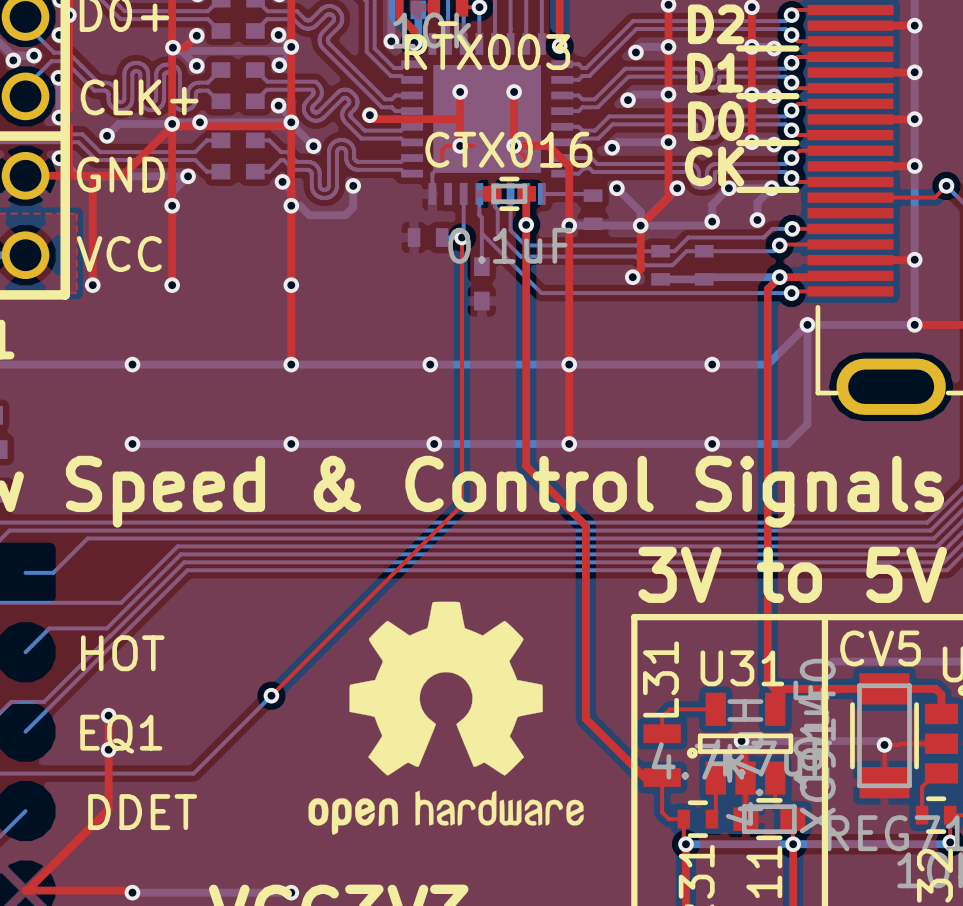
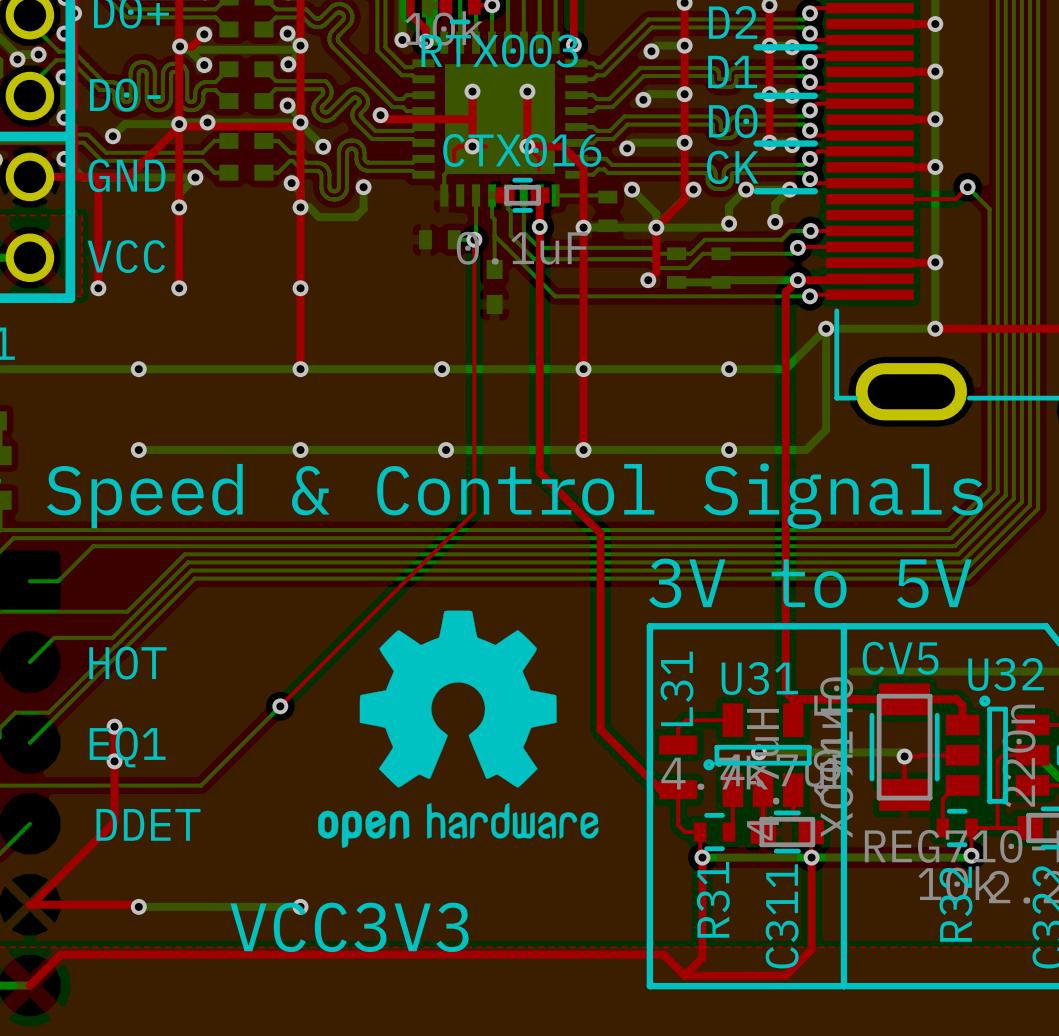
text: CLK+ (139, 97) -> D0- (125, 95)

